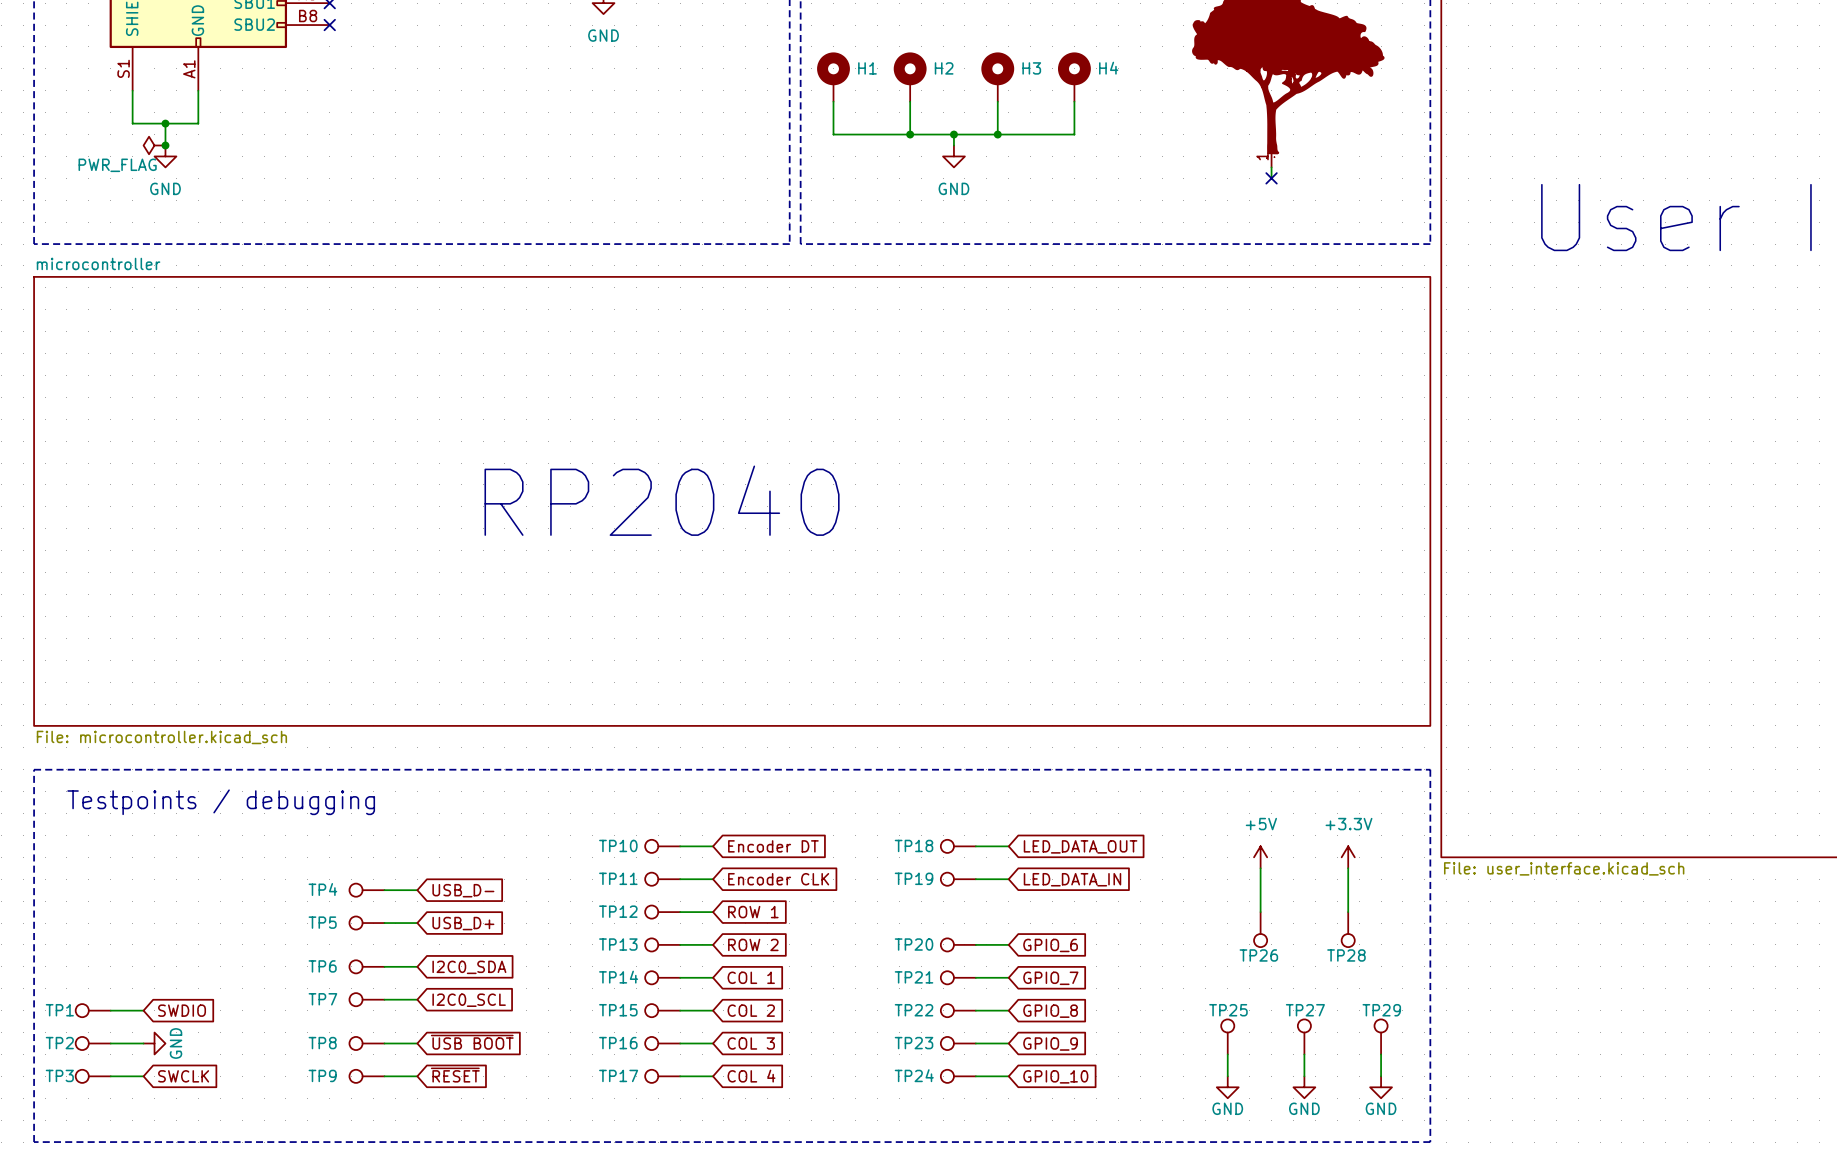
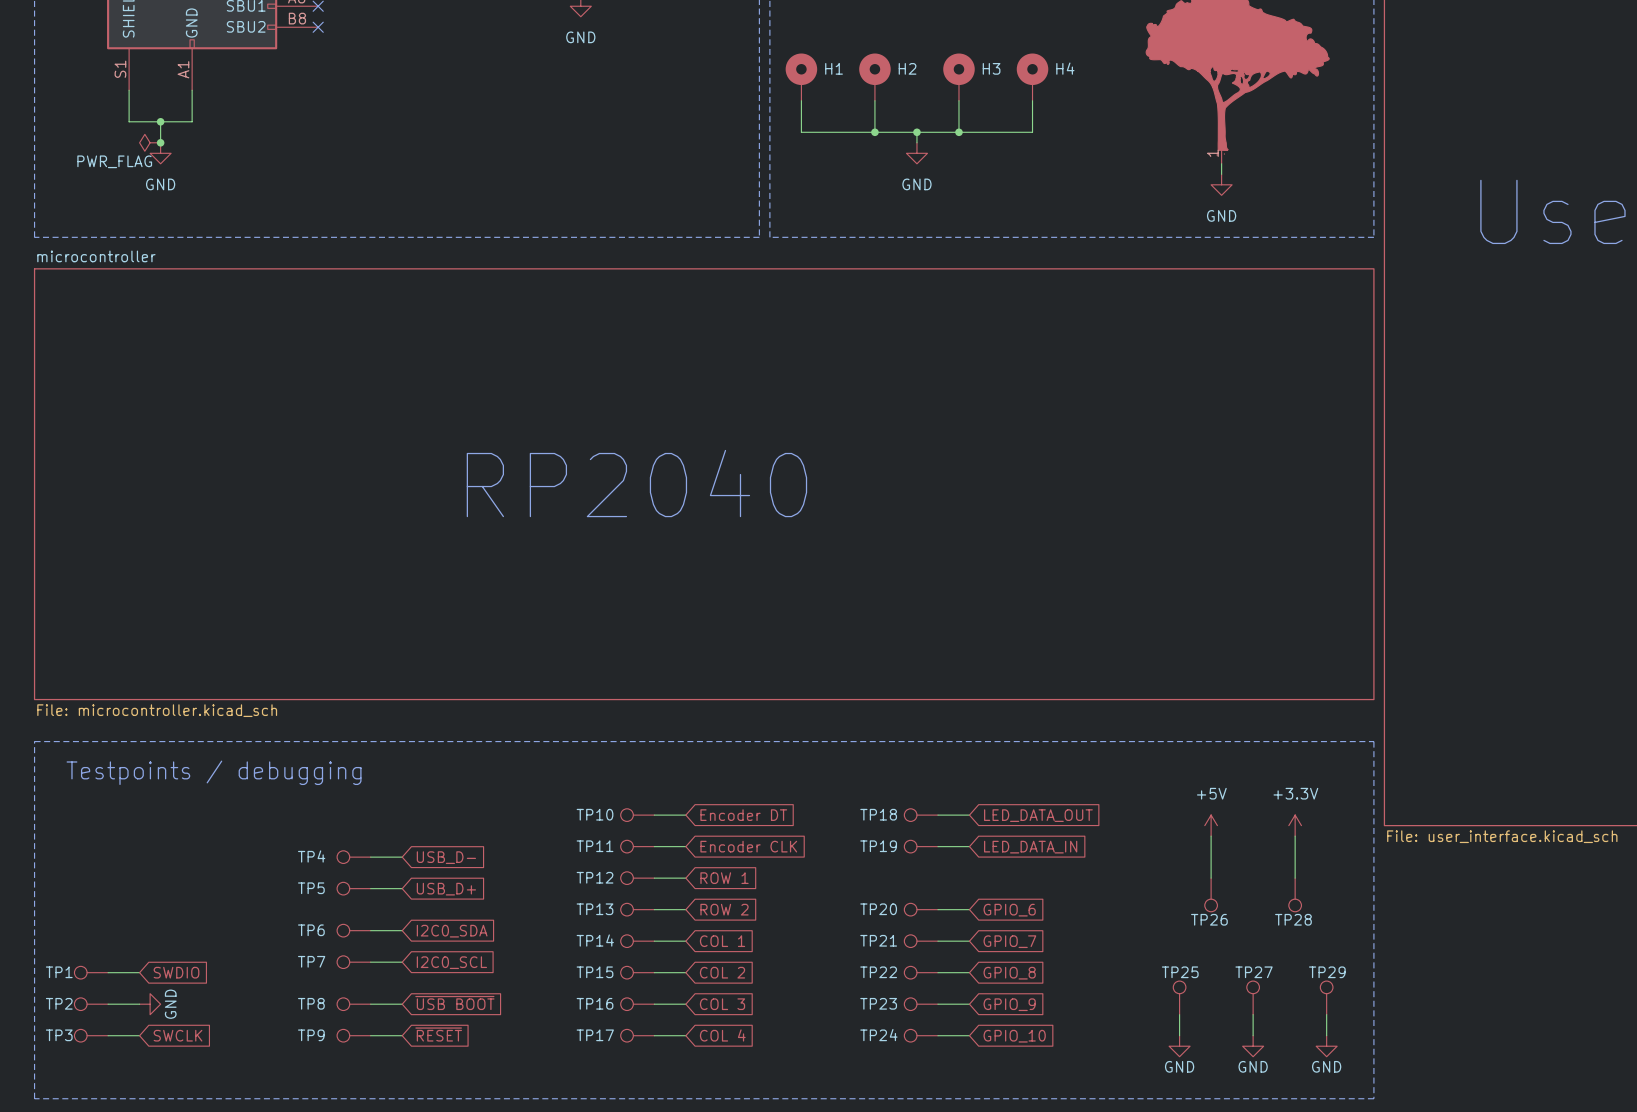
no-connect mark: (1271, 178) -> none
power symbol: none -> GND (1221, 184)

